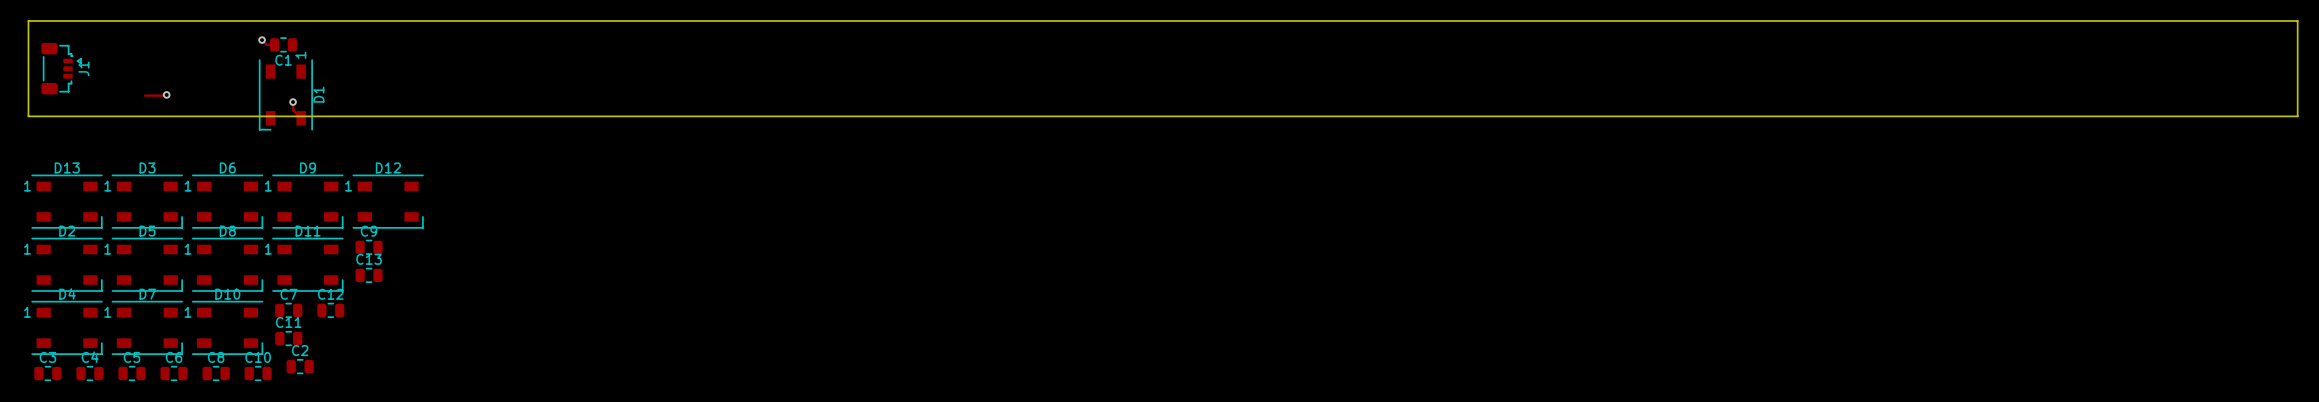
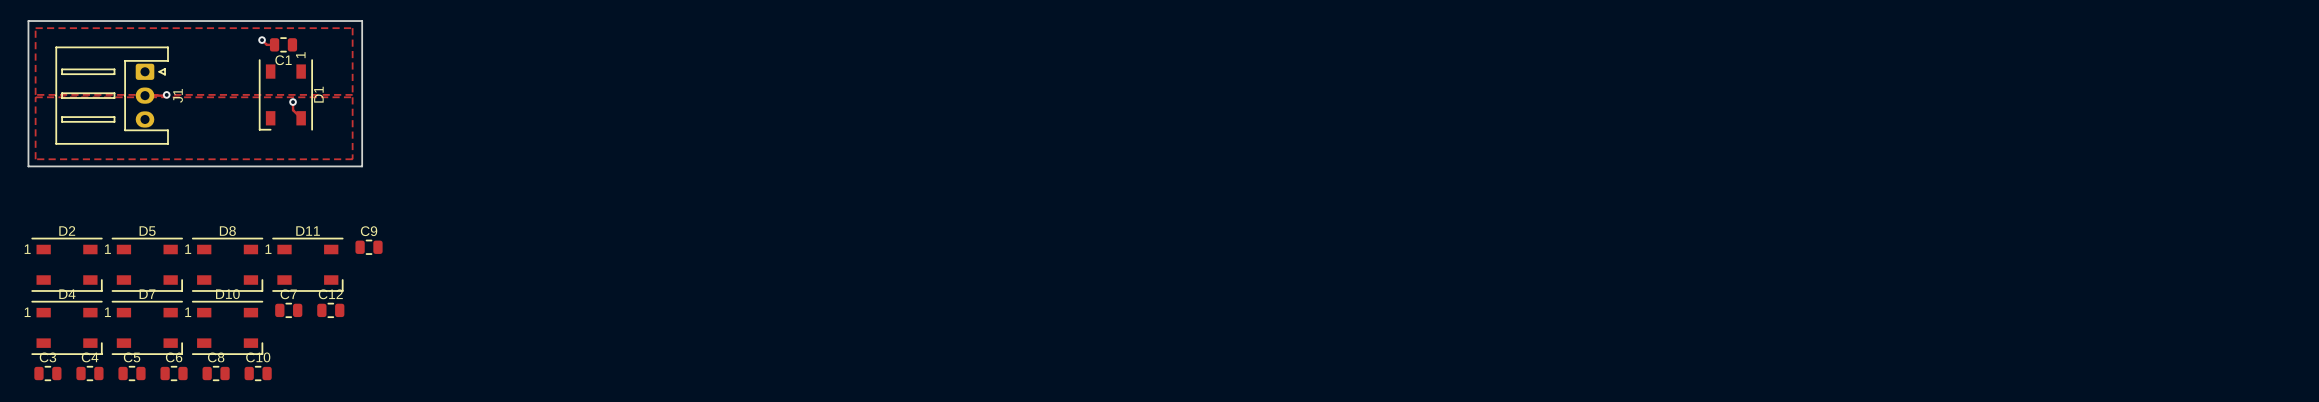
board edge: (362, 21) (2297, 21) (2297, 116) (28, 116) -> (362, 21) (362, 166) (28, 166) (28, 116)
zone outline: none -> (35, 28) (35, 94) (352, 94) (352, 28) (35, 28)
J1 footprint: [41, 42, 82, 95] -> [55, 46, 169, 145]
J1 name position: J1 (83, 68) -> J1 (178, 95)
zone outline: none -> (35, 97) (35, 159) (352, 159) (352, 97) (35, 97)
D13: (67, 201) -> none
D3: (147, 201) -> none
D6: (227, 201) -> none
D9: (307, 201) -> none
D12: (388, 201) -> none
C13: (369, 275) -> none
C11: (288, 338) -> none
C2: (300, 366) -> none

